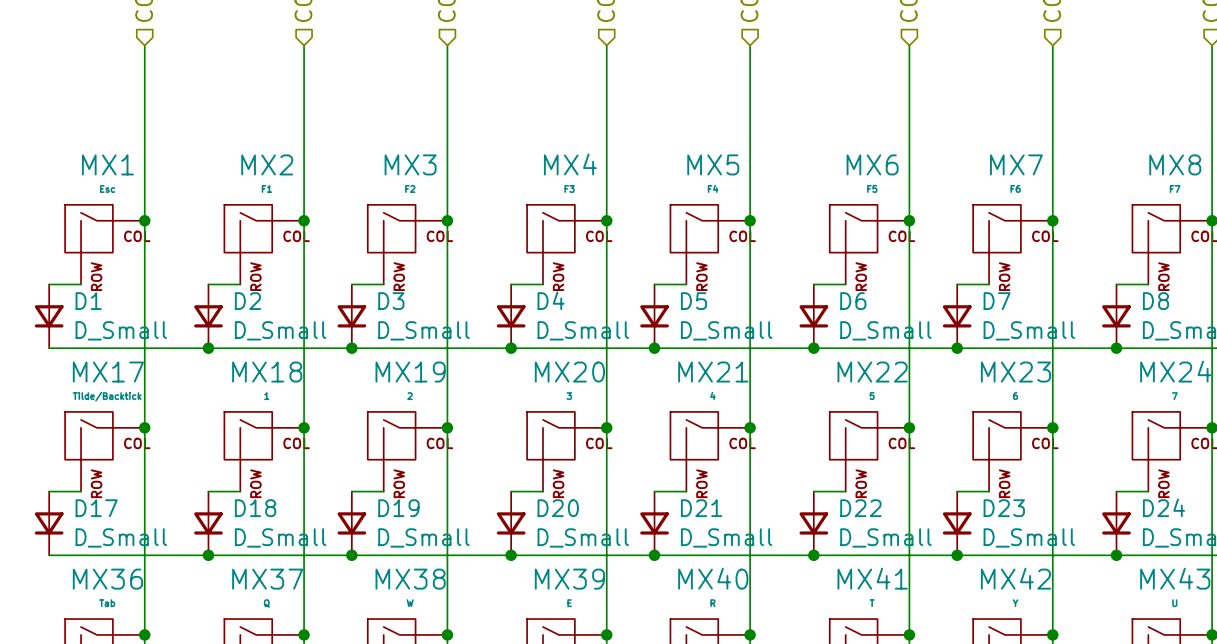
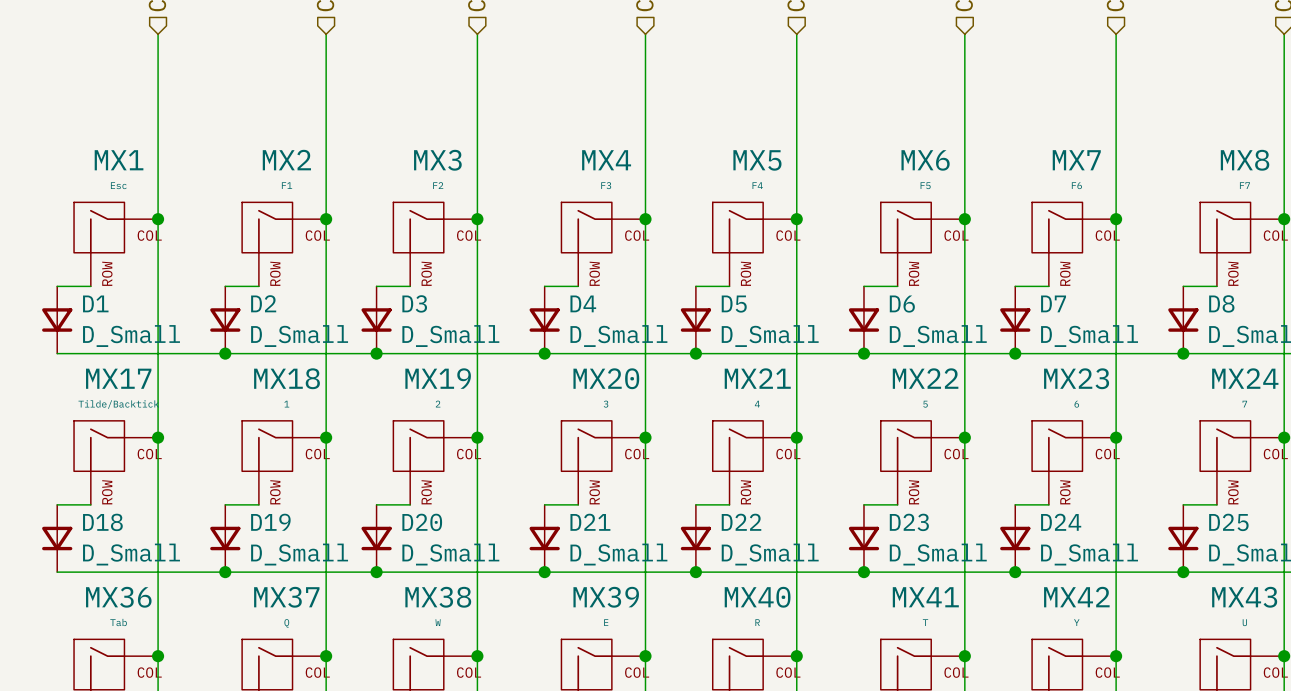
D24 name: D24 (1163, 507) -> D25 (1228, 522)
D17 name: D17 (96, 508) -> D18 (102, 522)
D18 name: D18 (255, 508) -> D19 (270, 522)
D19 name: D19 (398, 508) -> D20 (422, 522)
D20 name: D20 (558, 508) -> D21 (590, 522)
D21 name: D21 (701, 508) -> D22 (741, 522)
D22 name: D22 (860, 508) -> D23 (909, 522)
D23 name: D23 (1004, 508) -> D24 (1061, 522)

